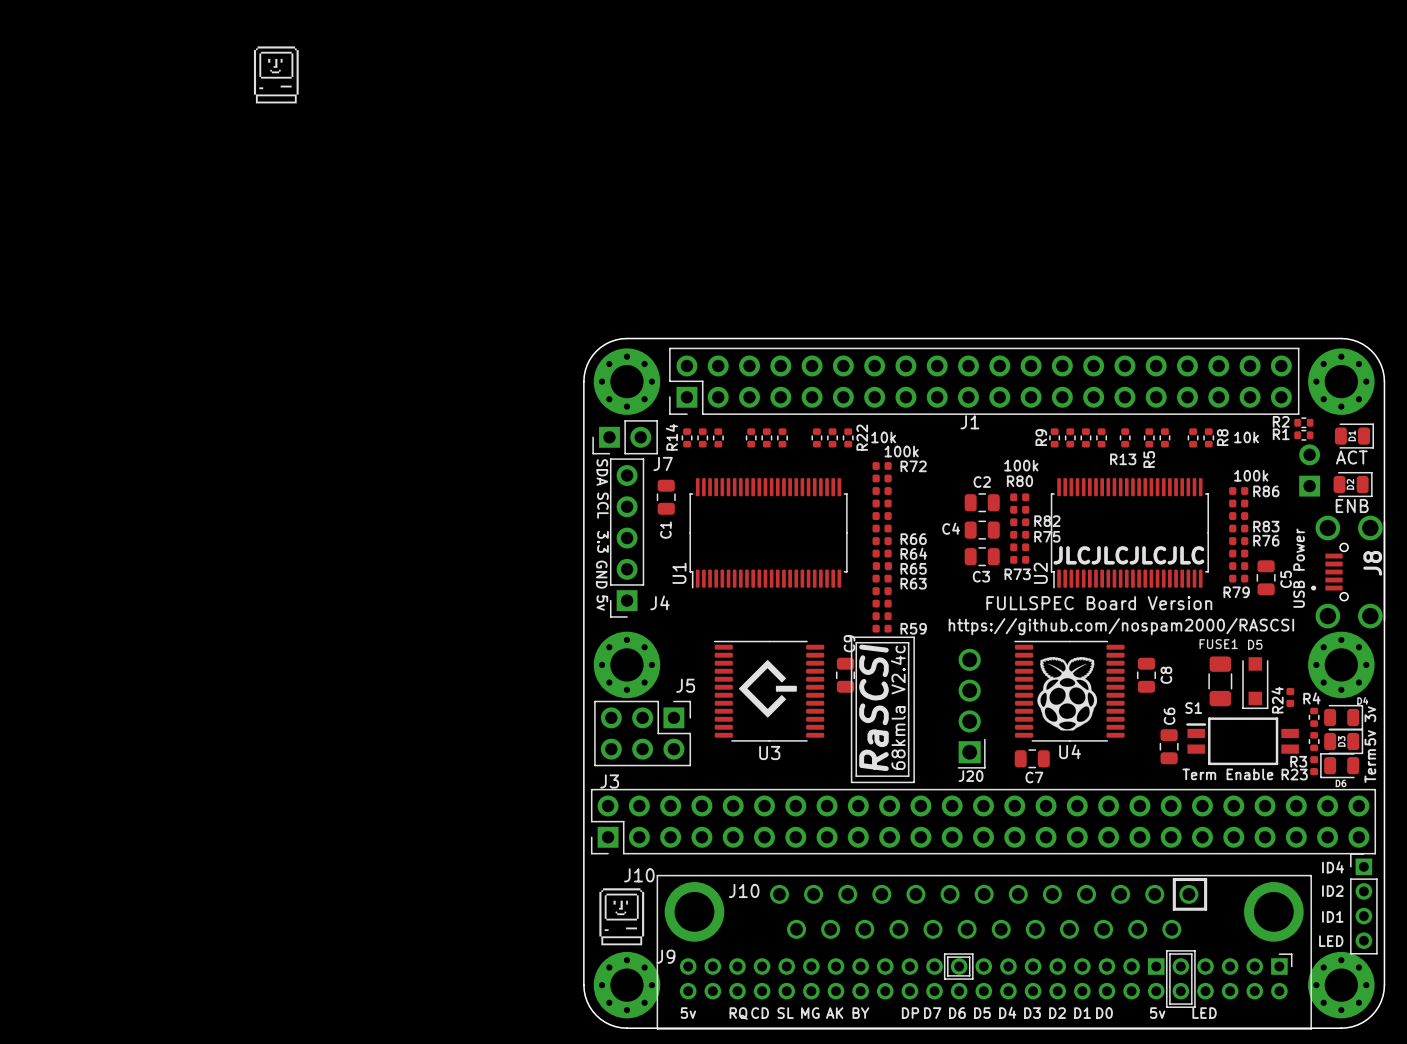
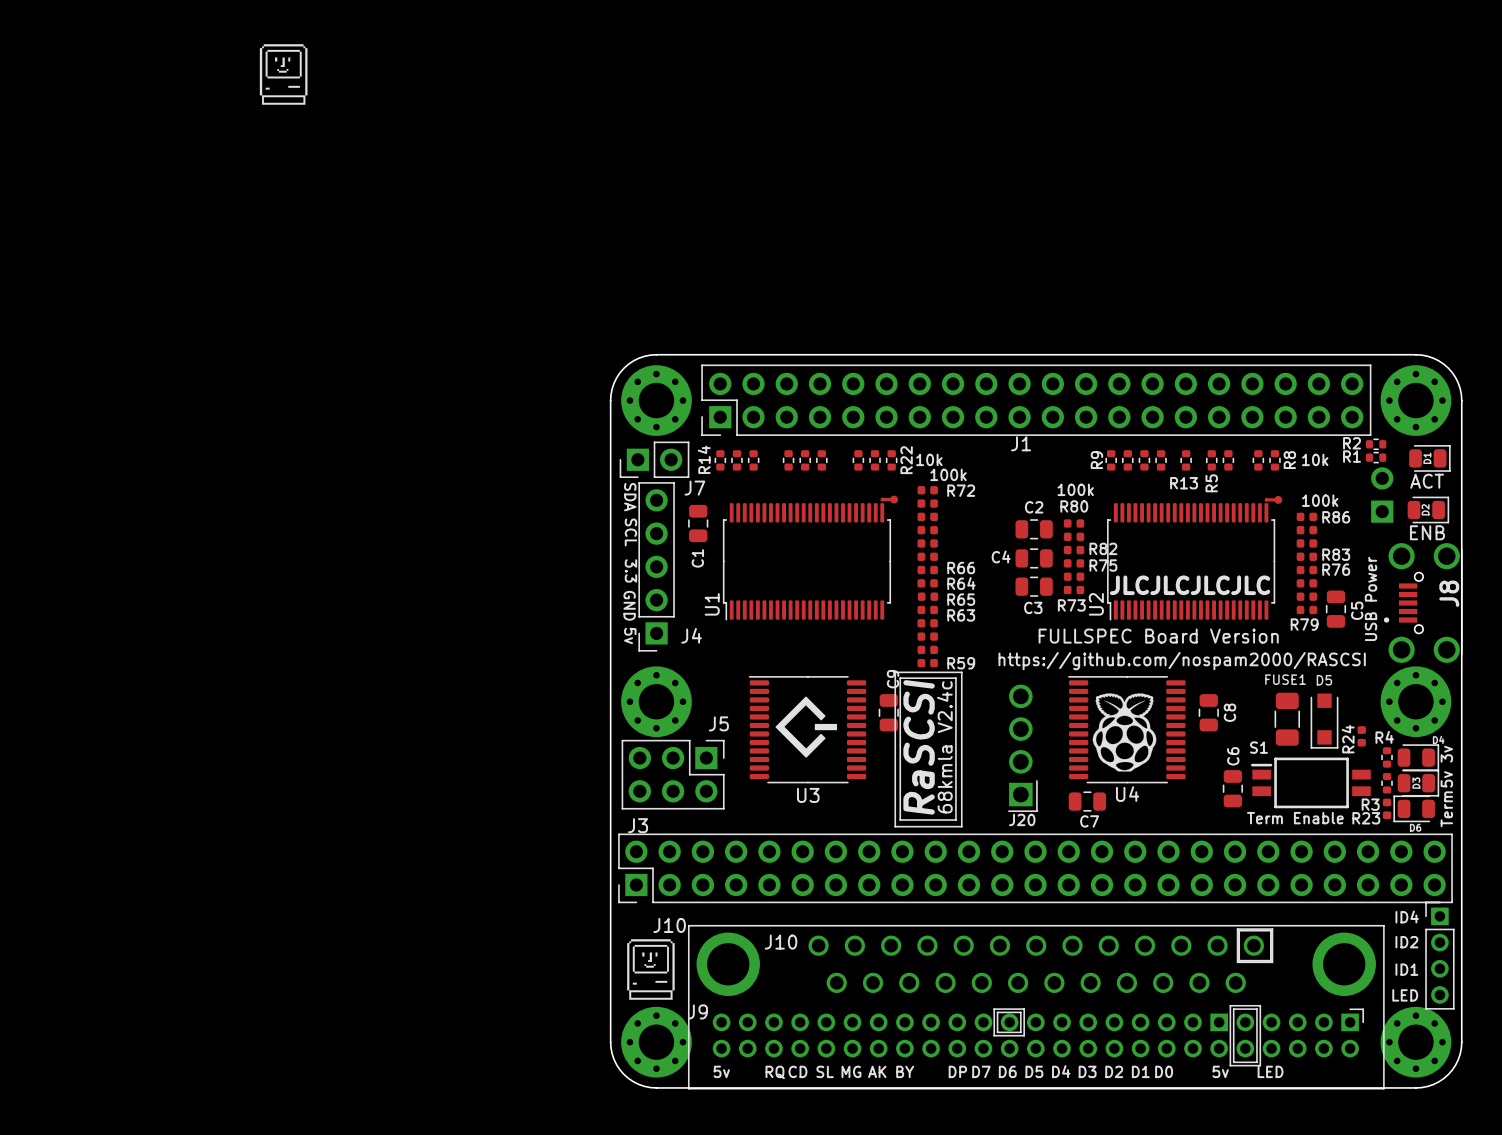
part: none -> (889, 499)
part: none -> (1273, 499)

